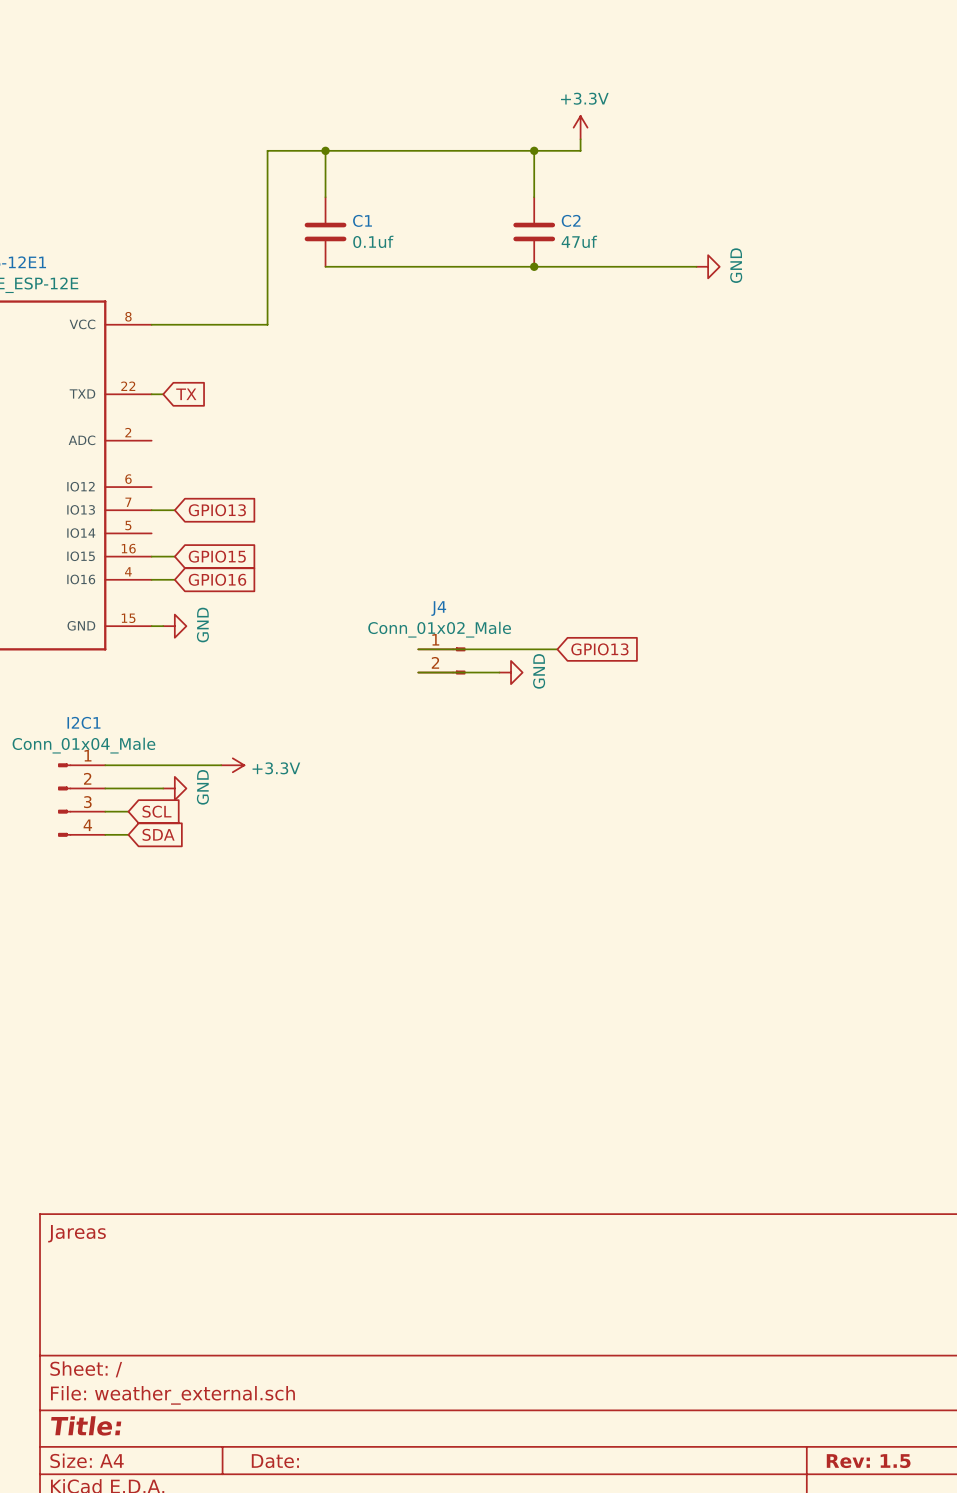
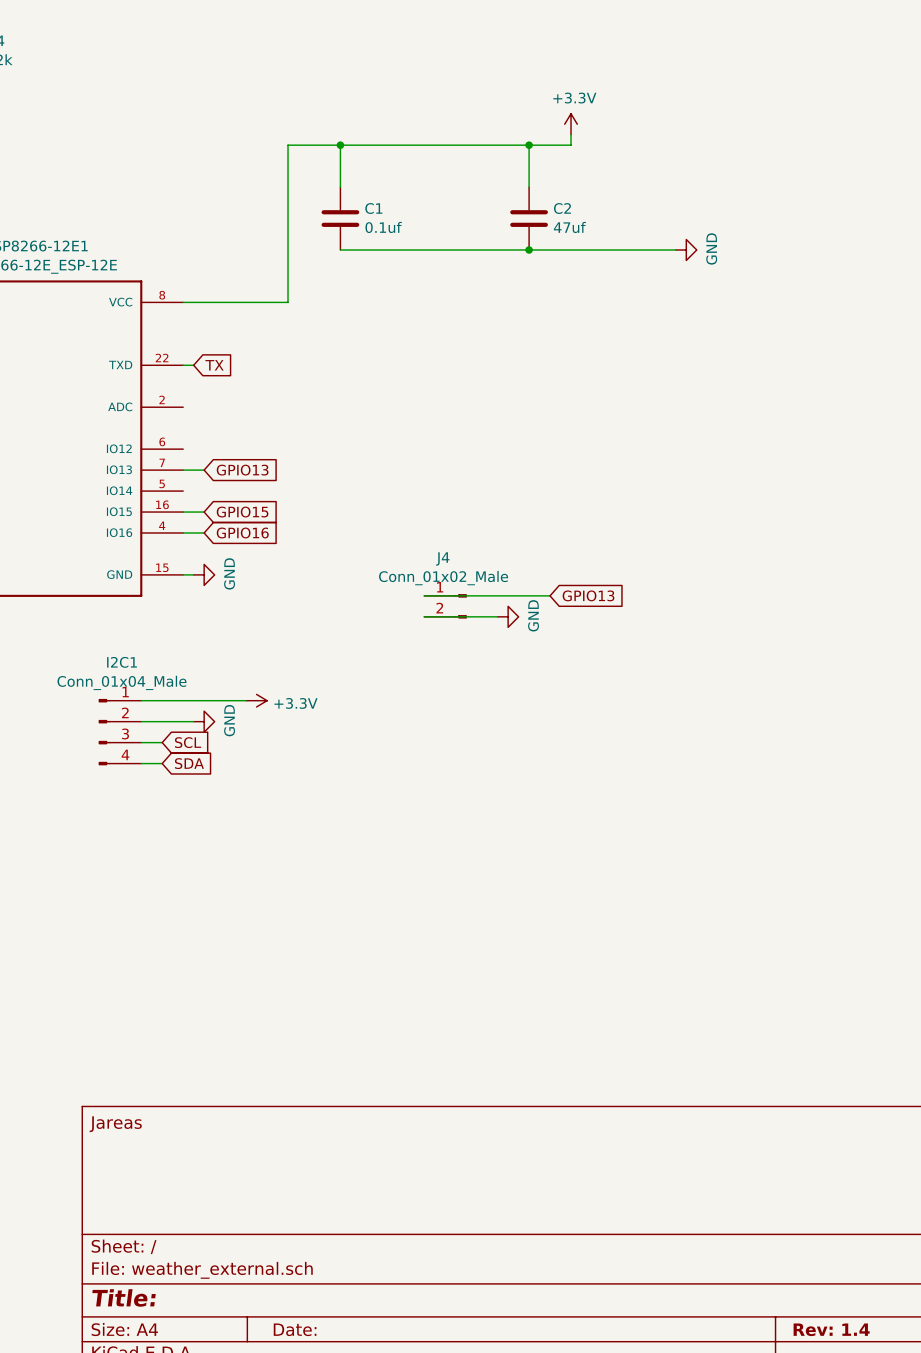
title block: Rev: 1.5 (868, 1461) -> Rev: 1.4 (831, 1329)

